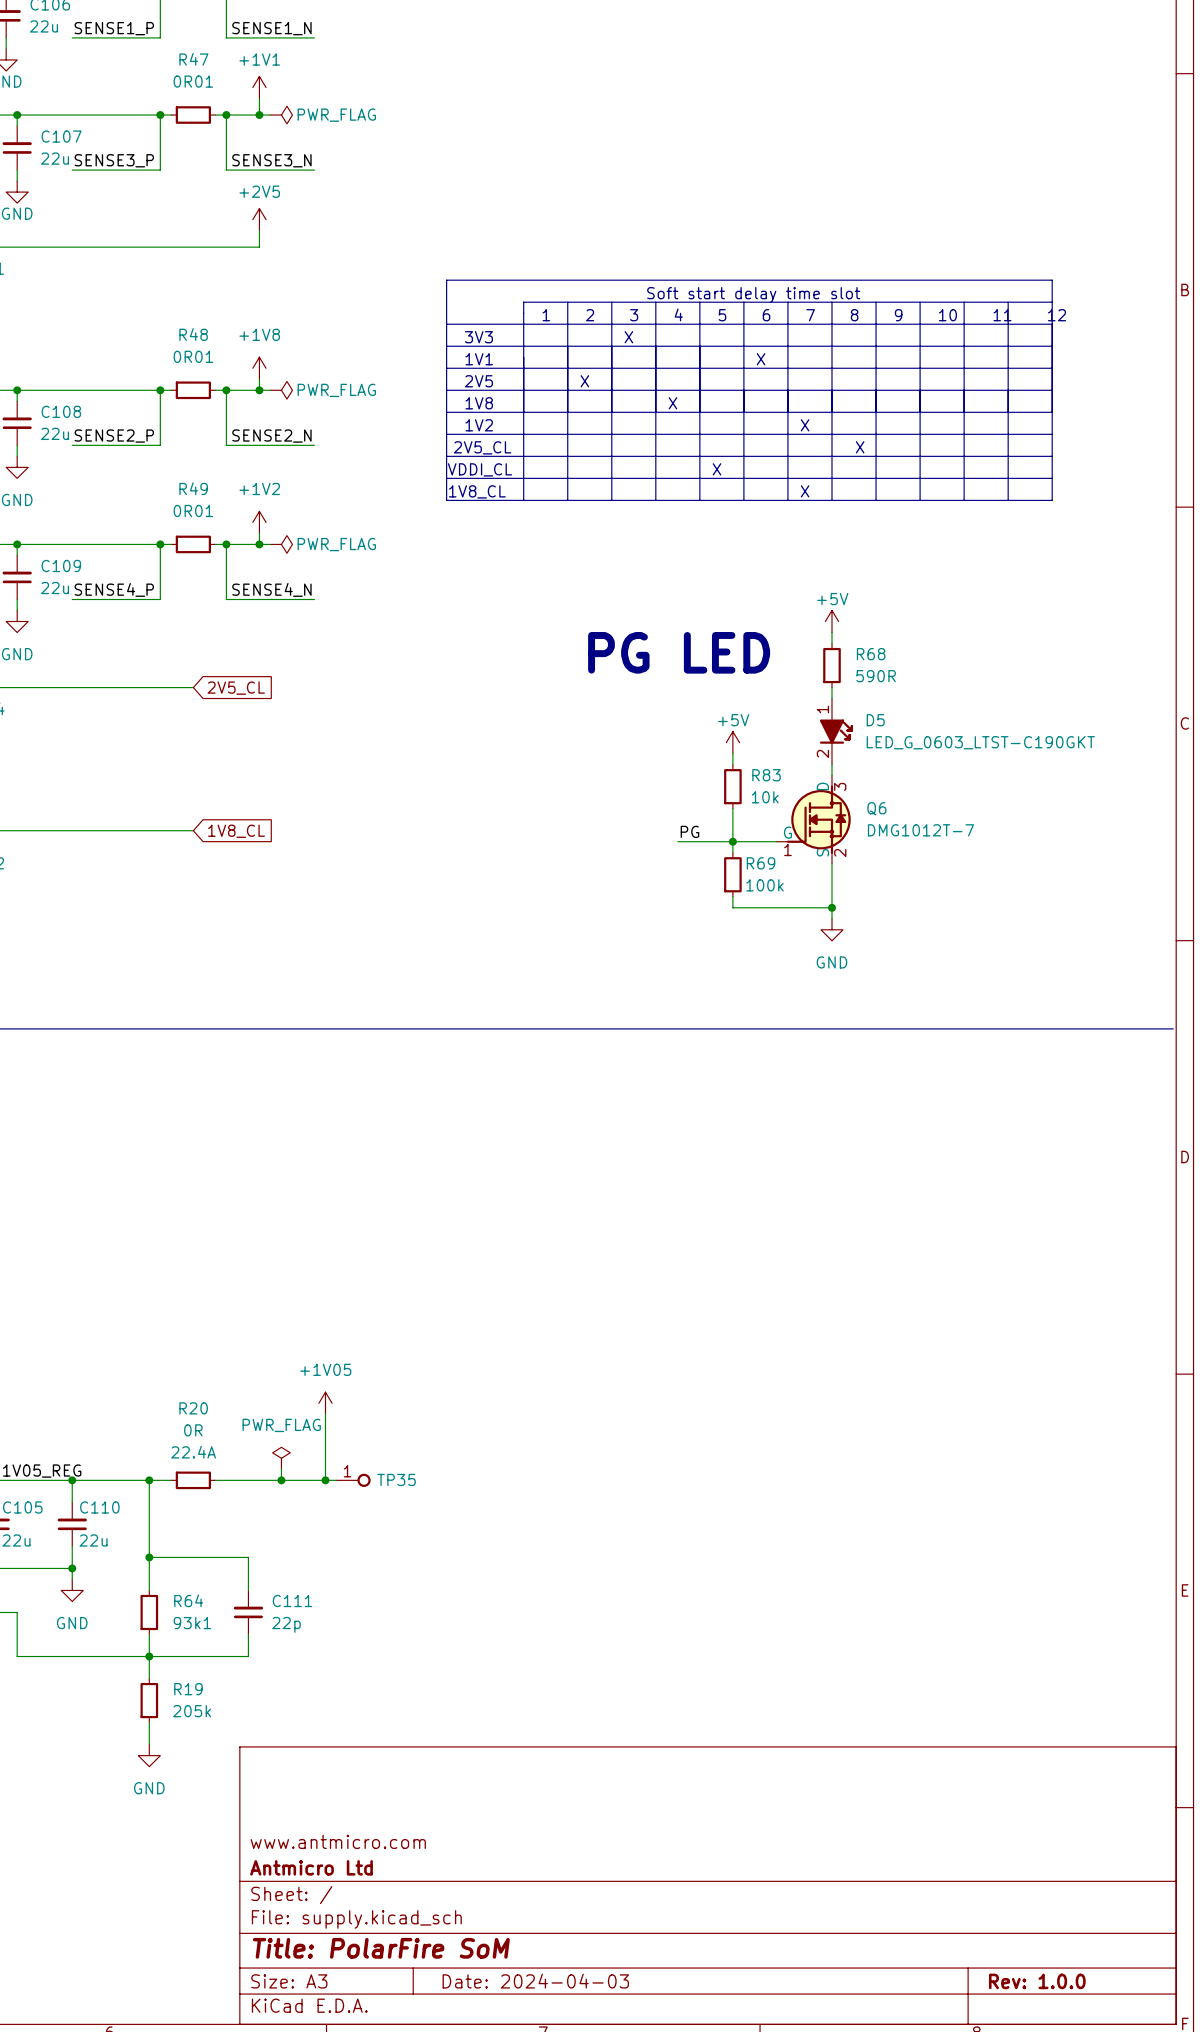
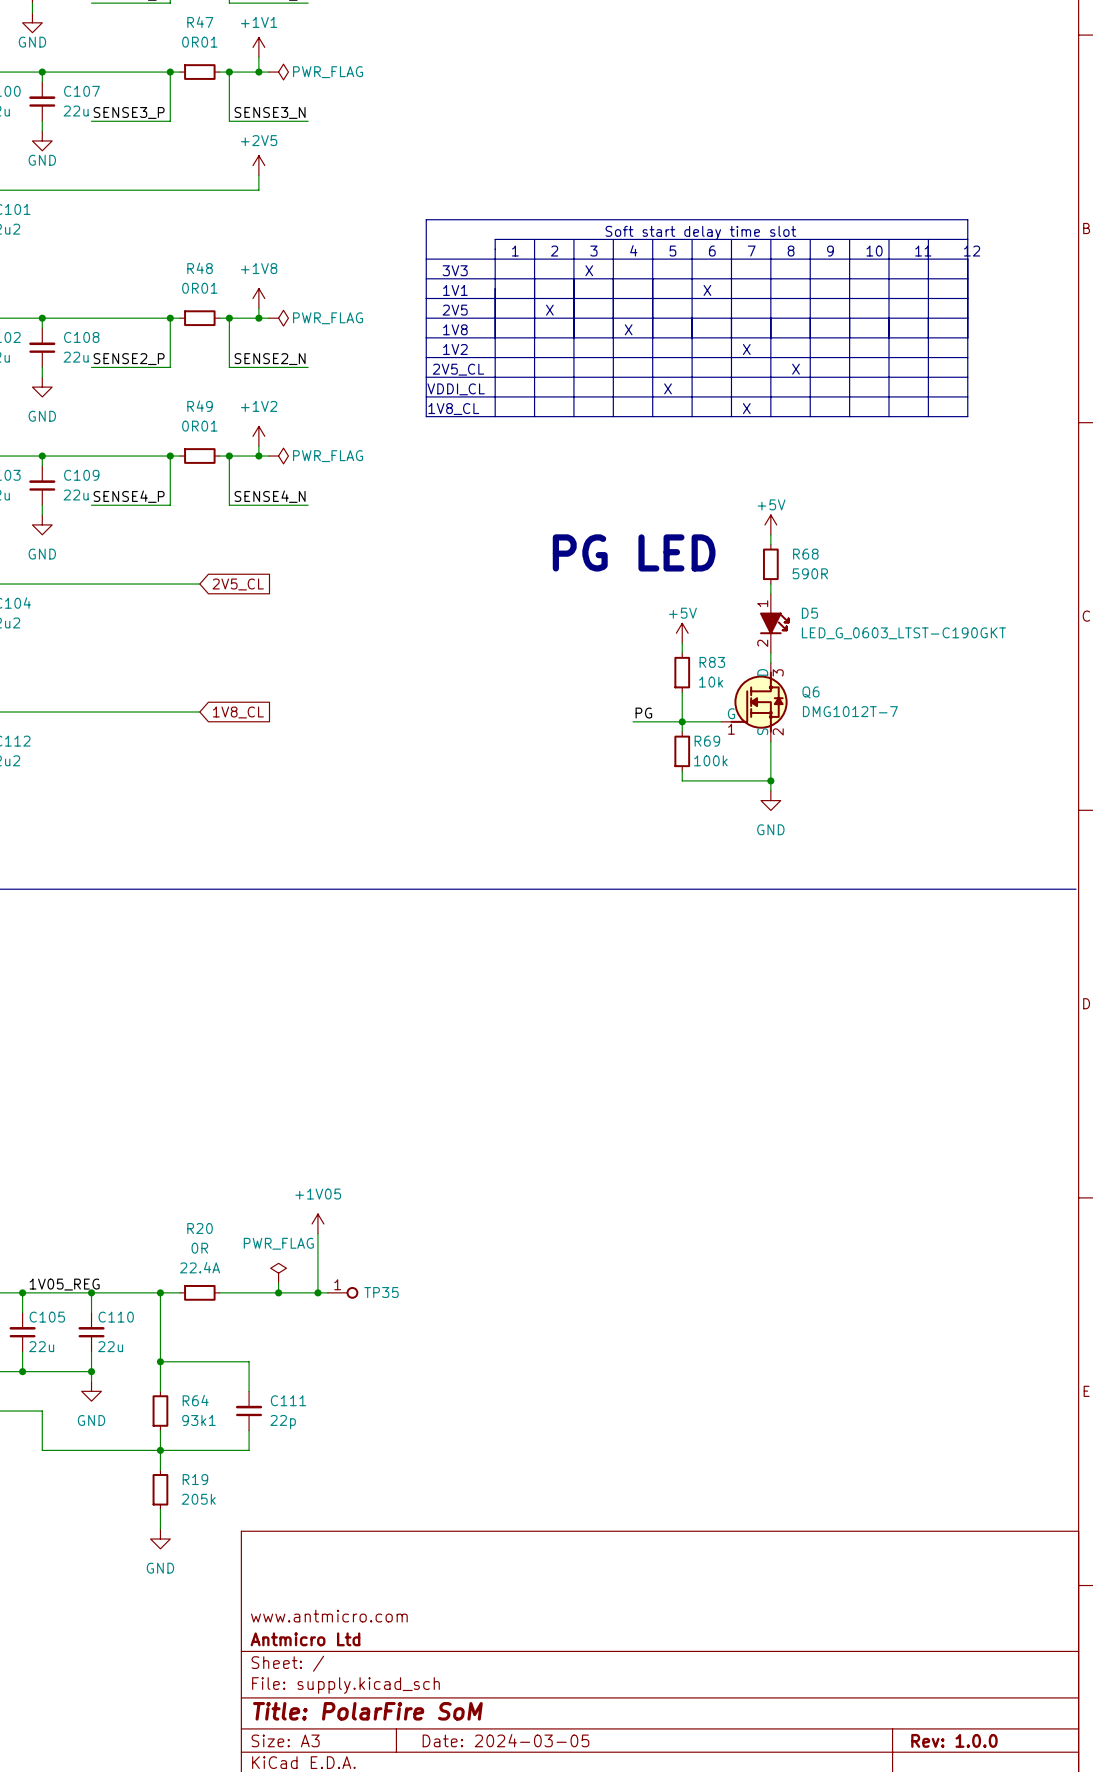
title block: Date: 2024-04-03 (535, 1981) -> Date: 2024-03-05 (506, 1740)

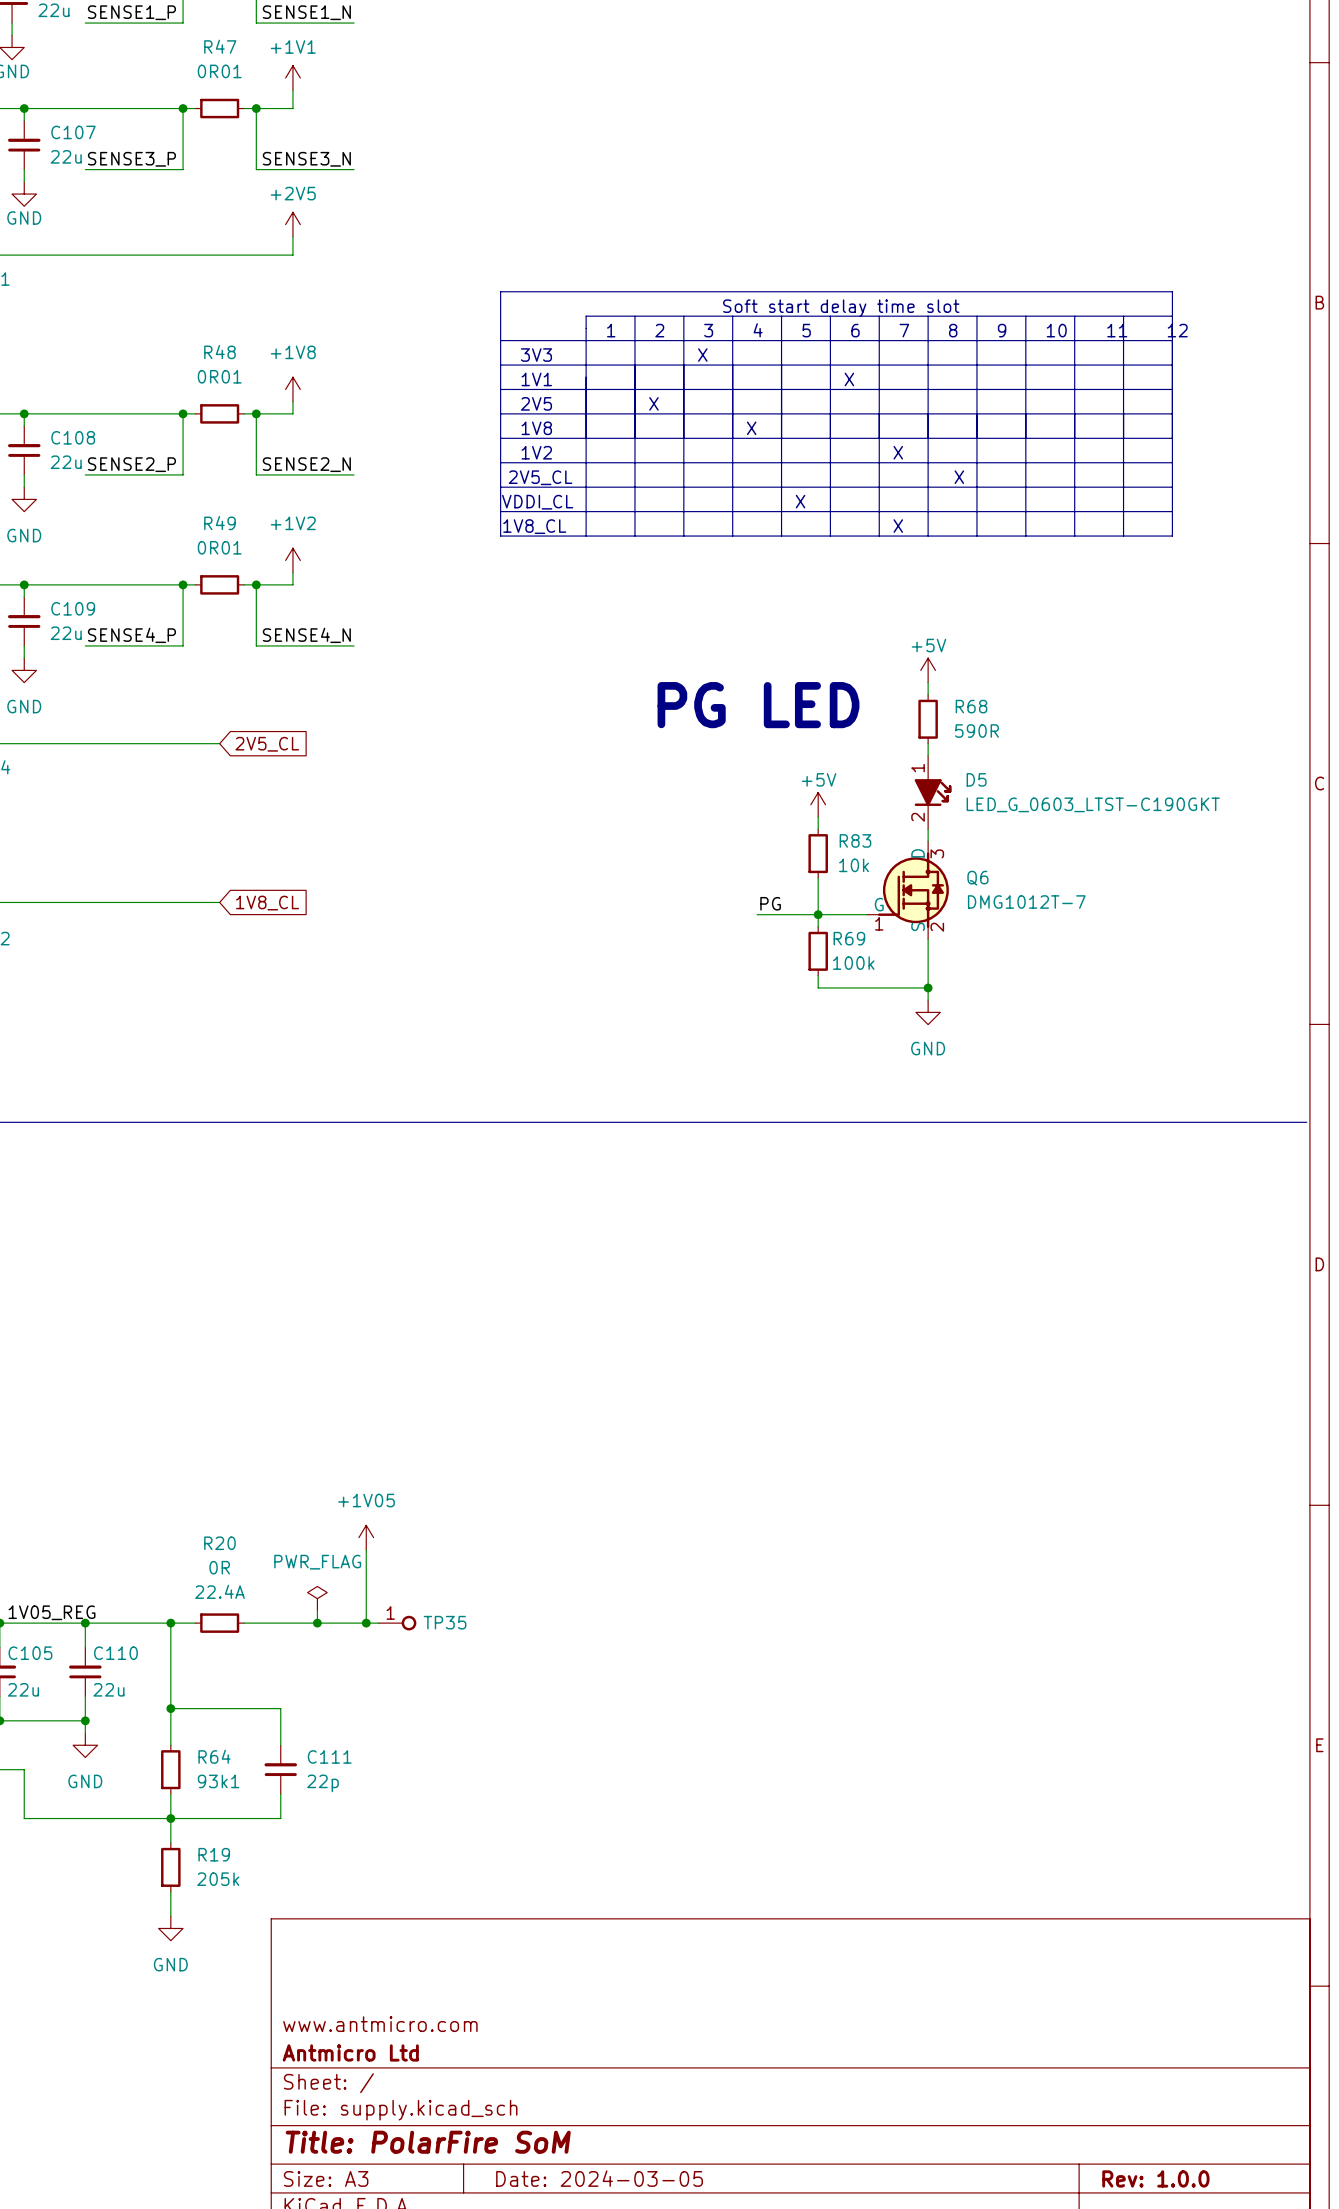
wire: (258, 72) (268, 72) -> none
junction: (258, 72) -> none
power symbol: PWR_FLAG (278, 72) -> none
wire: (258, 318) (268, 318) -> none
junction: (258, 318) -> none
power symbol: PWR_FLAG (278, 318) -> none
wire: (258, 456) (268, 456) -> none
junction: (258, 456) -> none
power symbol: PWR_FLAG (278, 456) -> none

